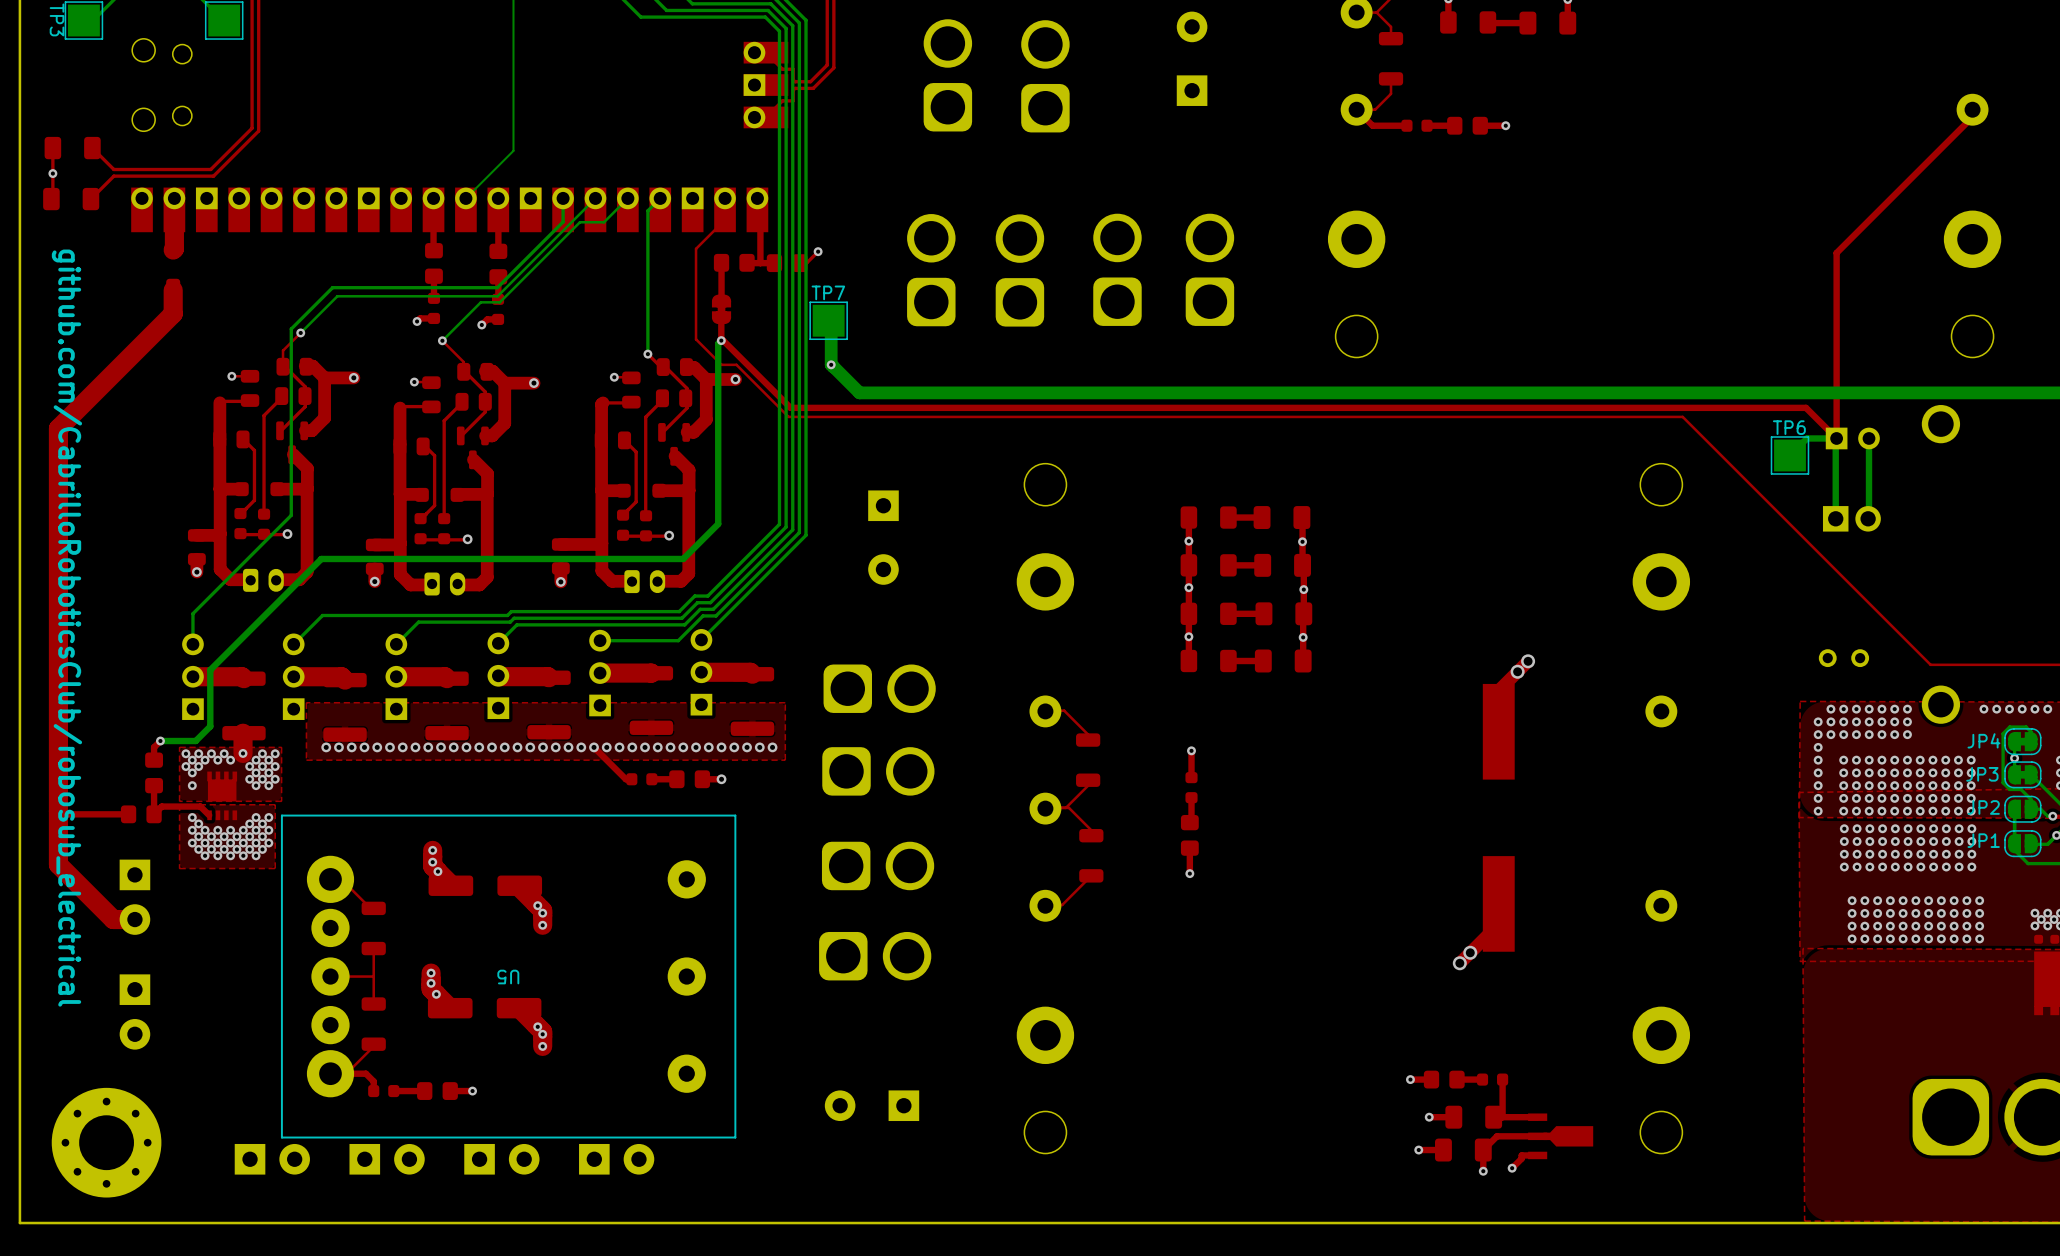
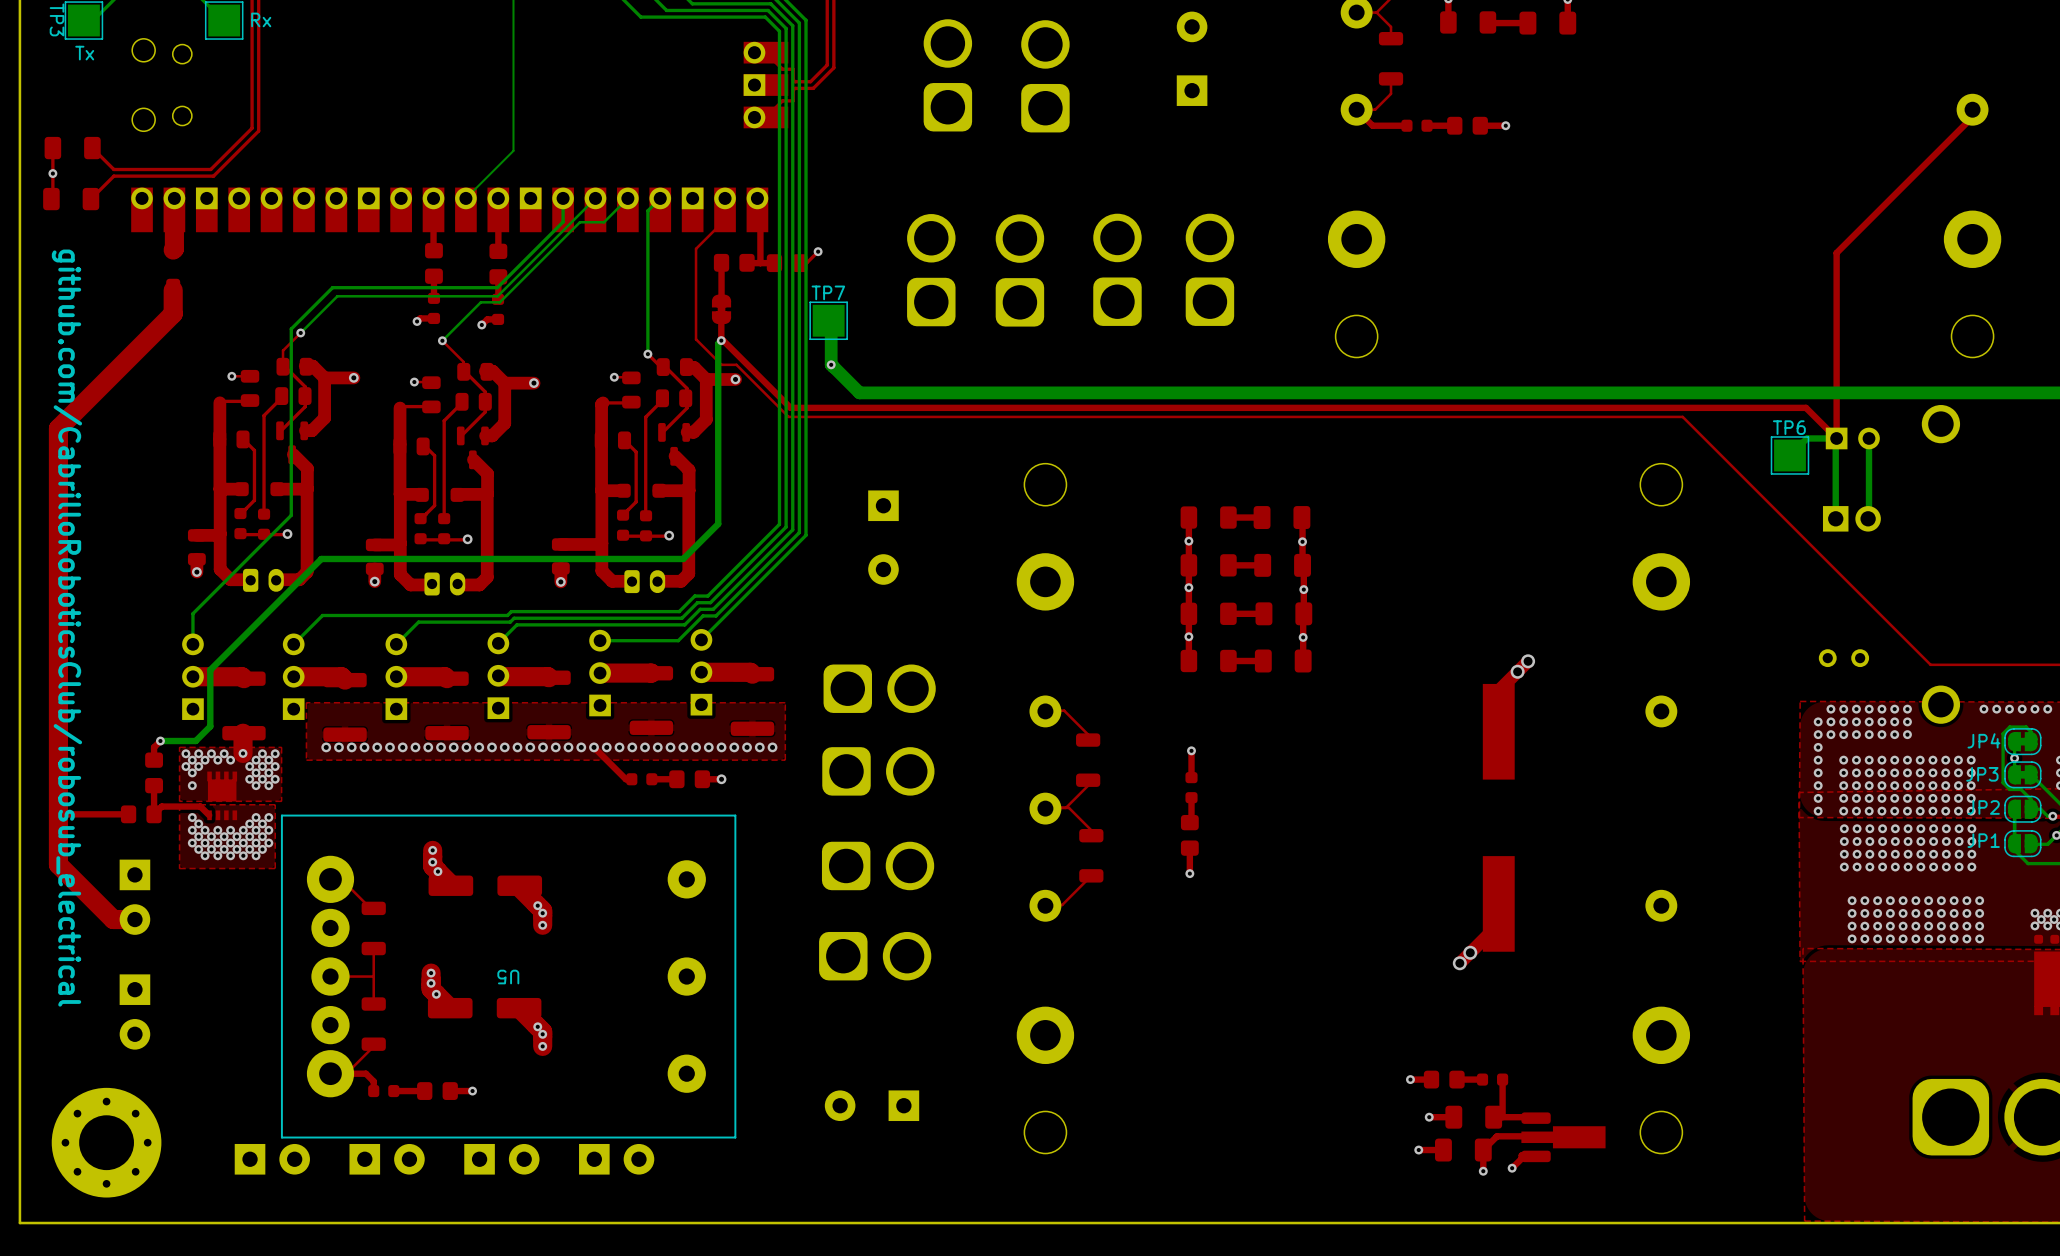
text: none -> Rx (261, 19)
text: none -> Tx (84, 53)
part footprint: [1528, 1113, 1594, 1160] -> [1521, 1112, 1606, 1163]

